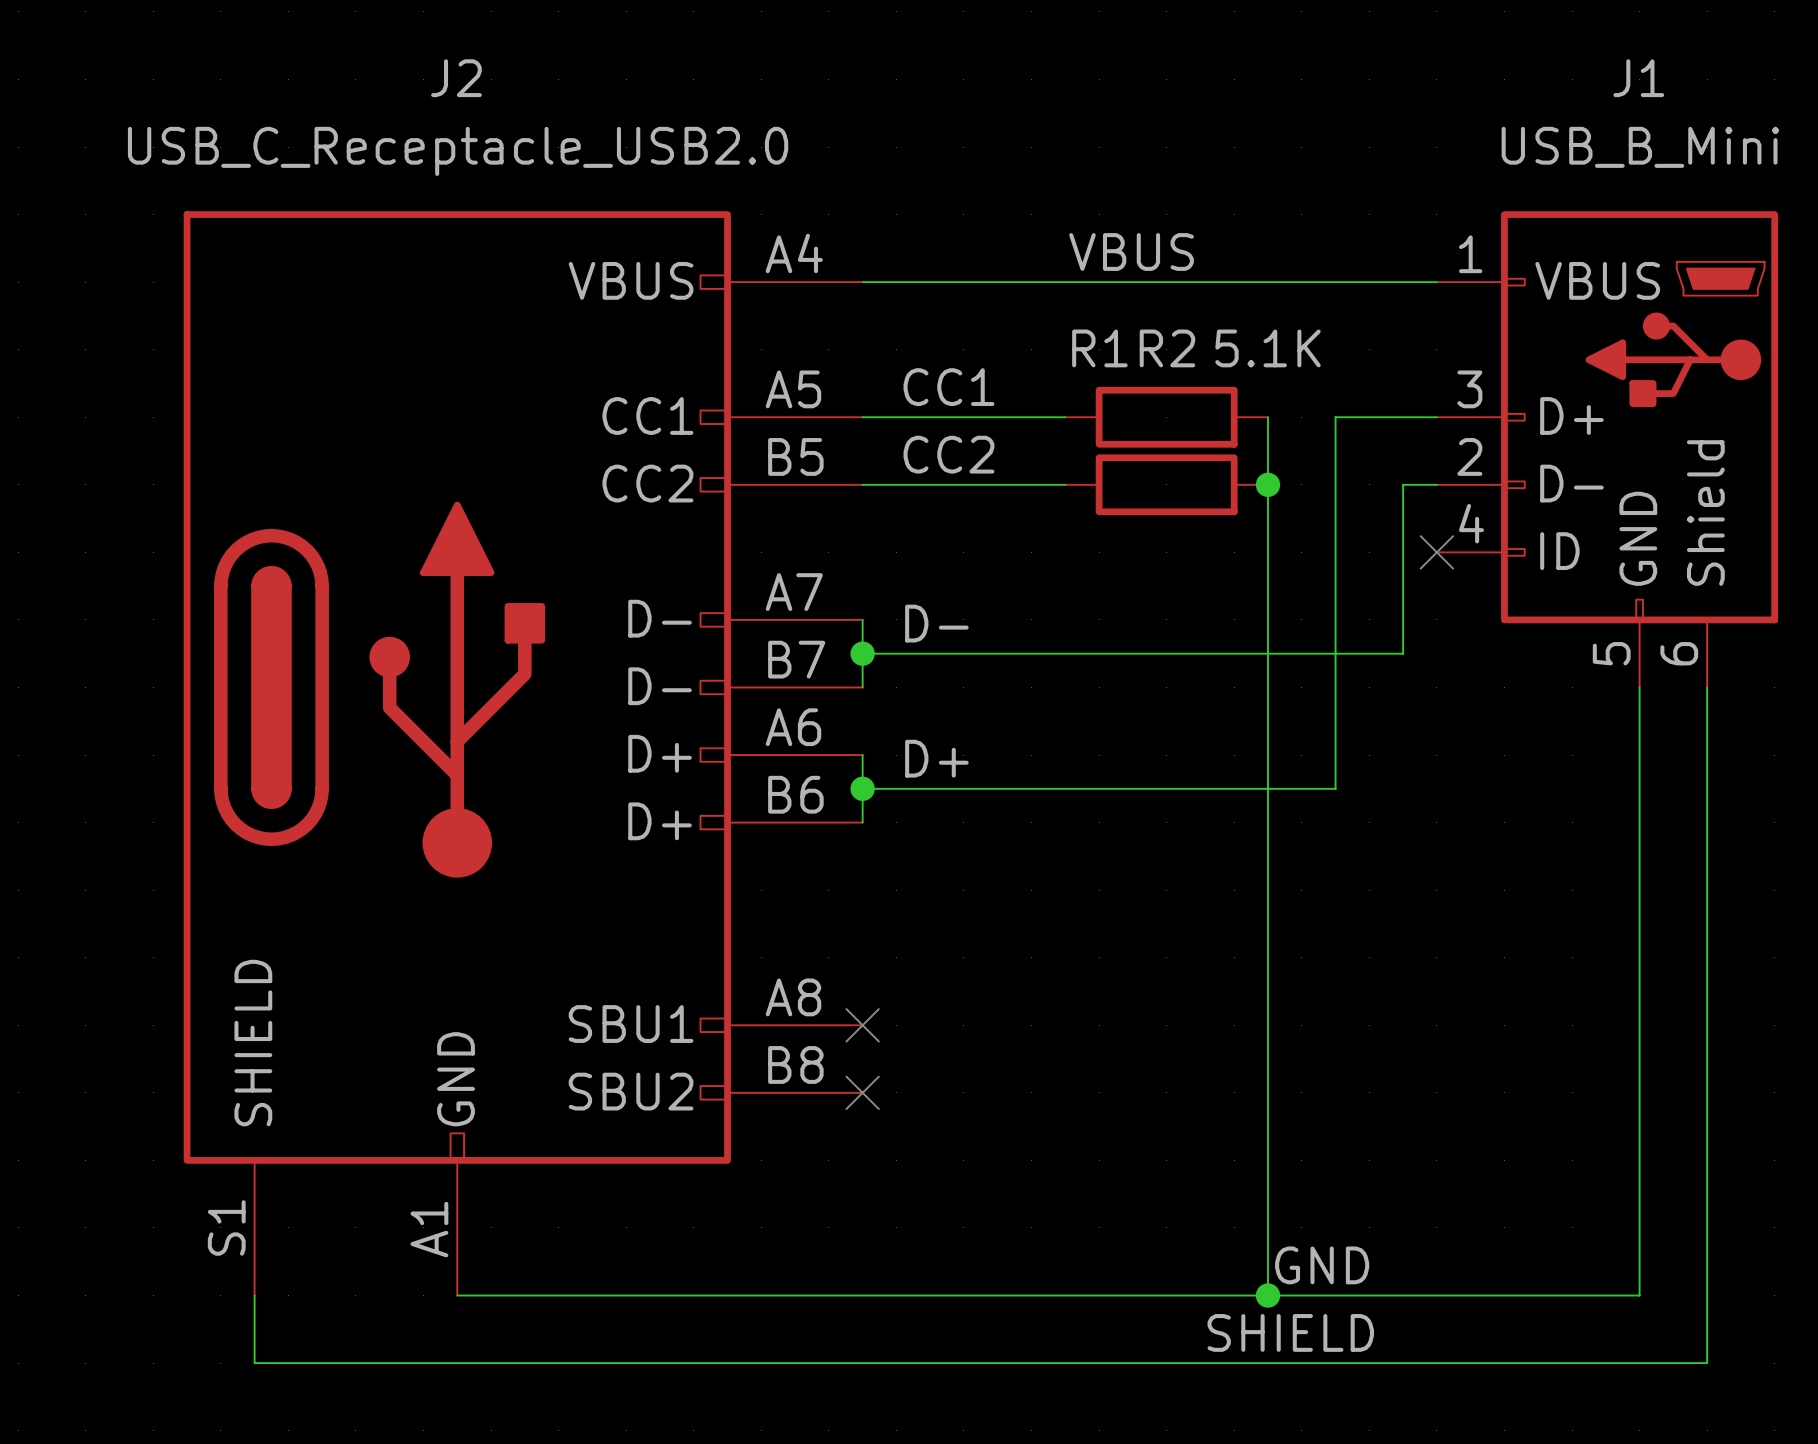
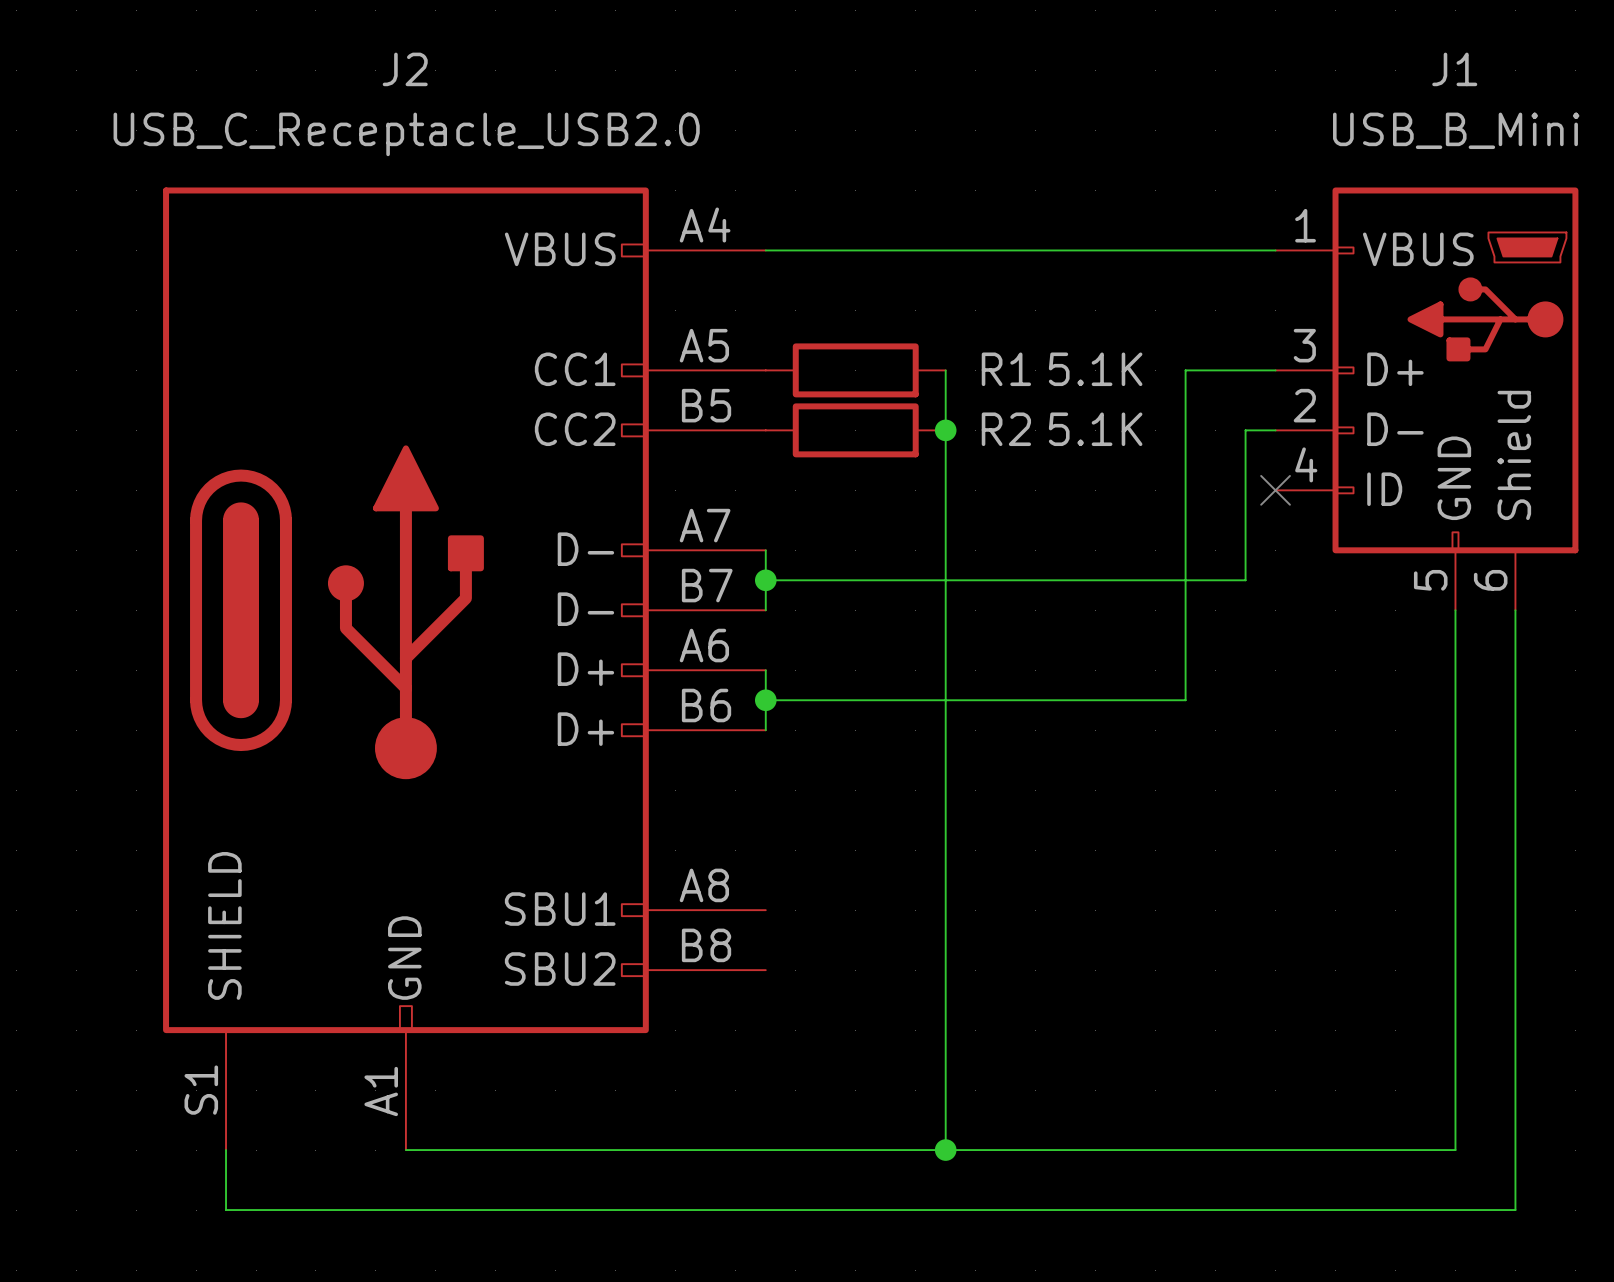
label: VBUS (1131, 251) -> none
R1 name position: R1 (1099, 348) -> R1 (1006, 369)
R2 name position: R2 (1167, 348) -> R2 (1006, 429)
R1 value position: 5.1K (1268, 348) -> 5.1K (1095, 369)
label: CC1 (948, 387) -> none
wire: (862, 417) (1065, 417) -> (945, 1150) (945, 370)
R1 position: (1166, 417) -> (855, 370)
wire: (1268, 417) (1268, 1295) -> none
label: CC2 (948, 454) -> none
R2 value: none -> 5.1K (1095, 429)
wire: (862, 484) (1065, 484) -> none
junction: none -> (945, 430)
R2 position: (1166, 484) -> (855, 430)
junction: (1268, 484) -> none
label: D- (936, 623) -> none
label: D+ (936, 758) -> none
no-connect mark: (862, 1025) -> none
no-connect mark: (862, 1092) -> none
label: GND (1322, 1265) -> none
junction: none -> (945, 1150)
junction: (1268, 1295) -> none
label: SHIELD (1290, 1332) -> none

